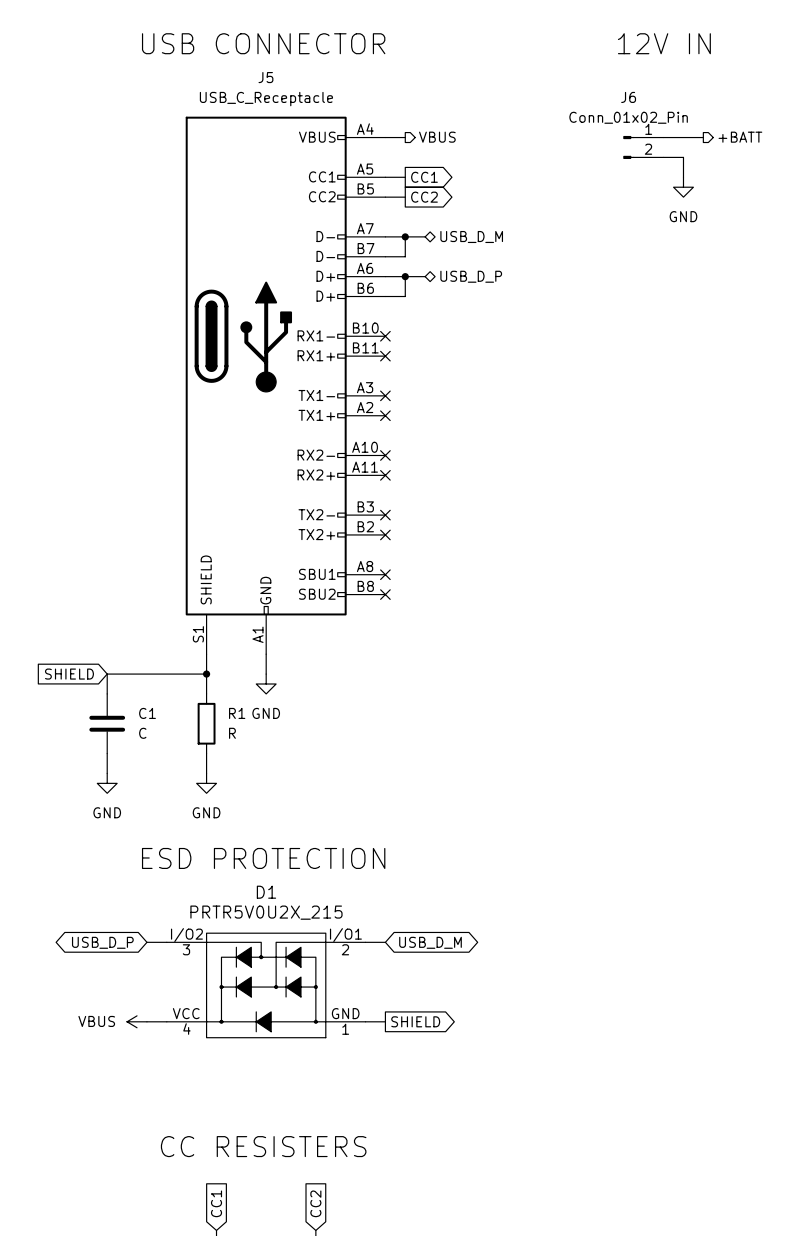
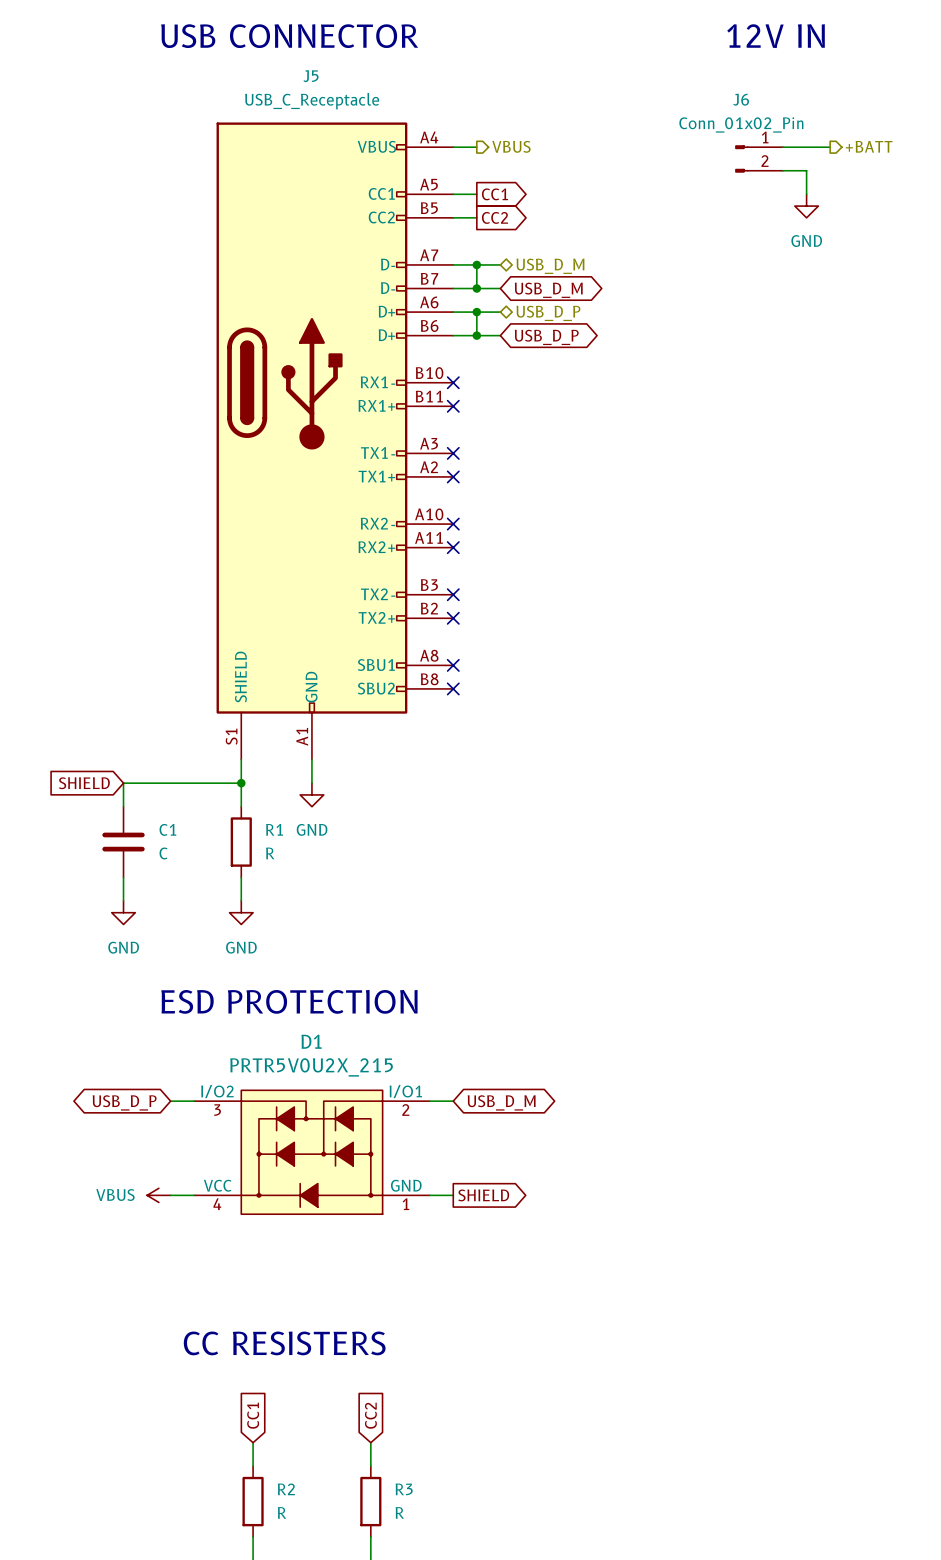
wire: none -> (476, 288) (500, 288)
junction: none -> (476, 288)
global label: none -> USB_D_M (548, 290)
wire: none -> (476, 335) (500, 335)
junction: none -> (476, 335)
global label: none -> USB_D_P (546, 337)

